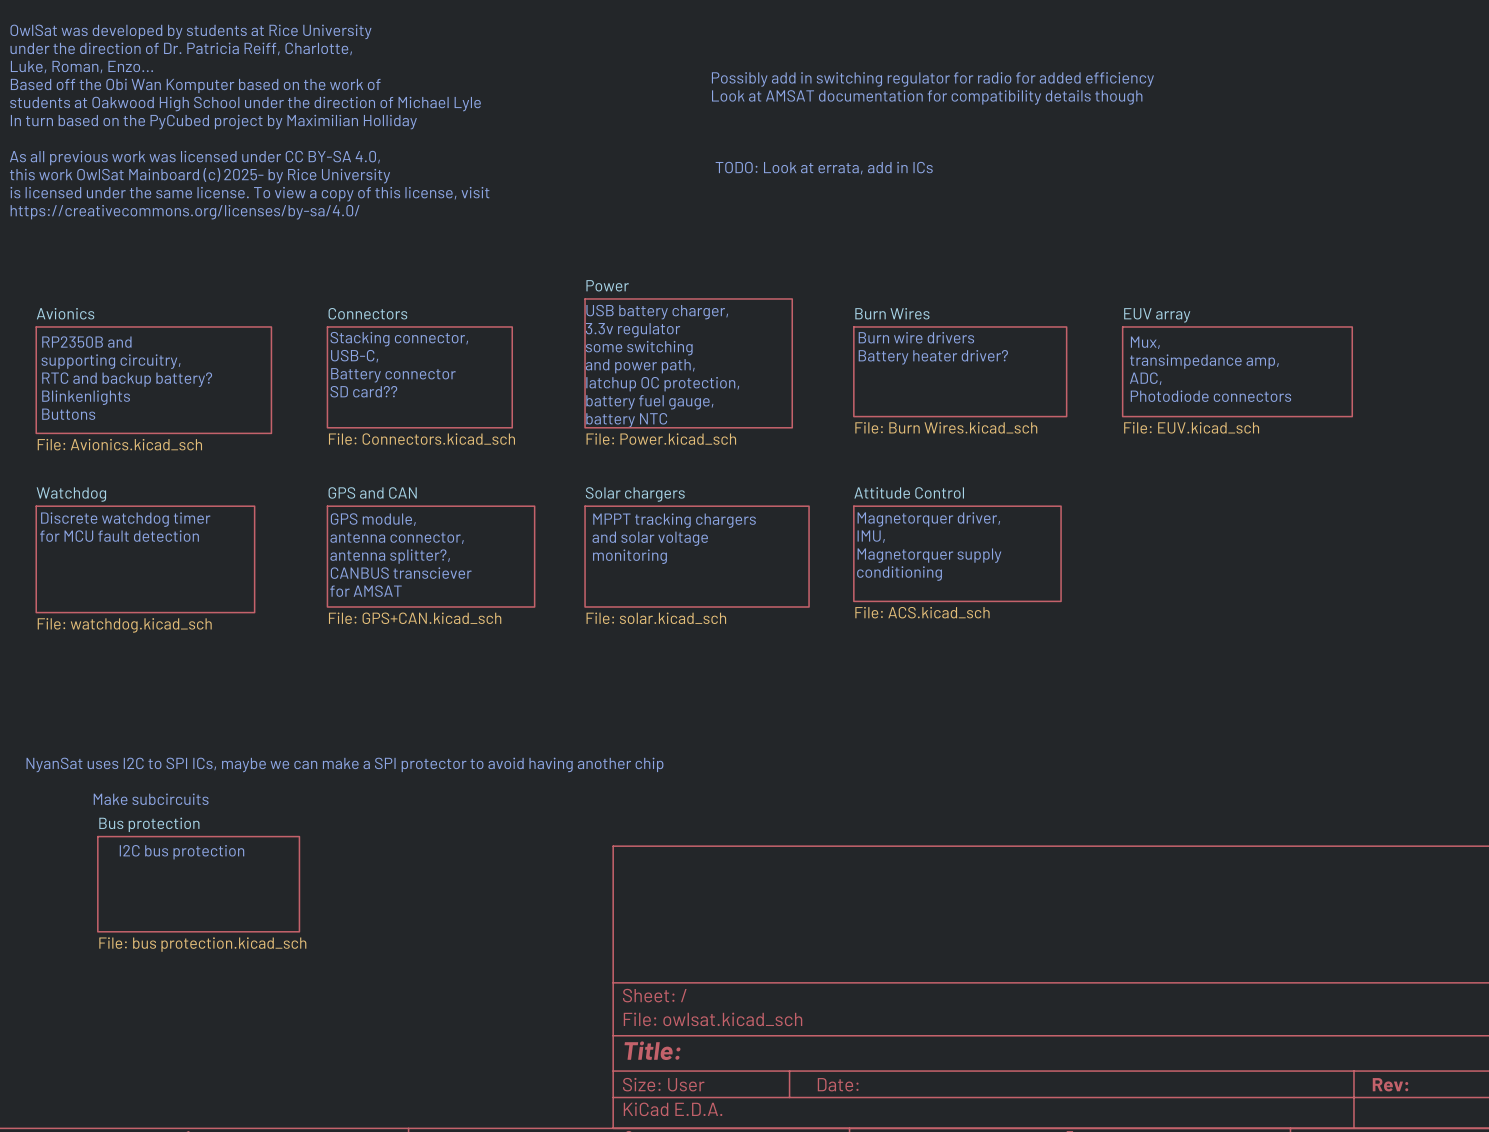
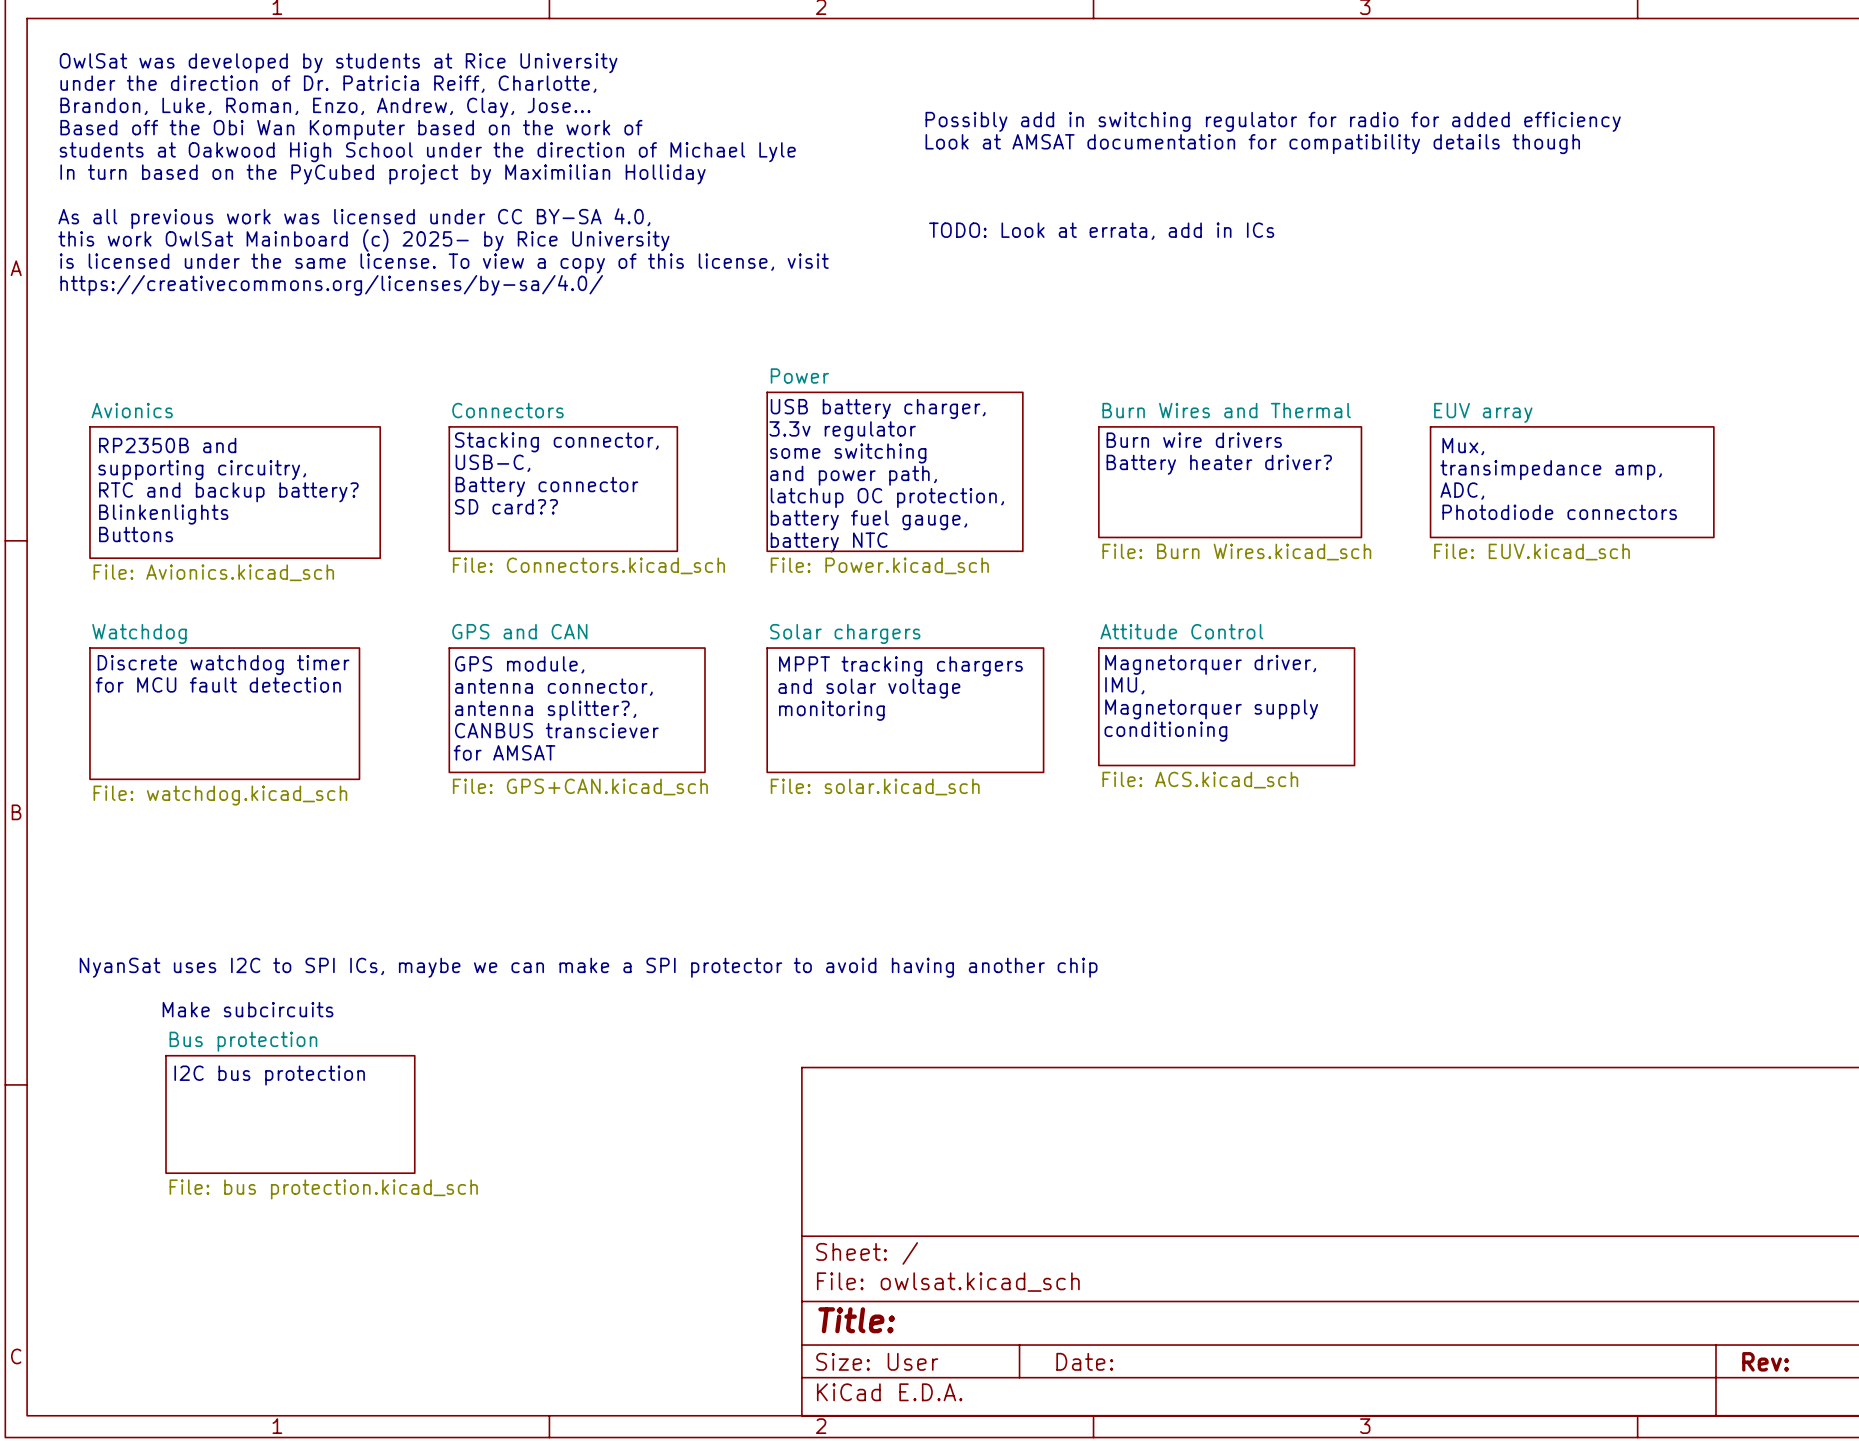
text: Luke, Roman, Enzo... (81, 67) -> Brandon, Luke, Roman, Enzo, Andrew, Clay, Jose... (325, 107)
sheet Burn Wires name: Burn Wires (892, 313) -> Burn Wires and Thermal (1226, 410)

